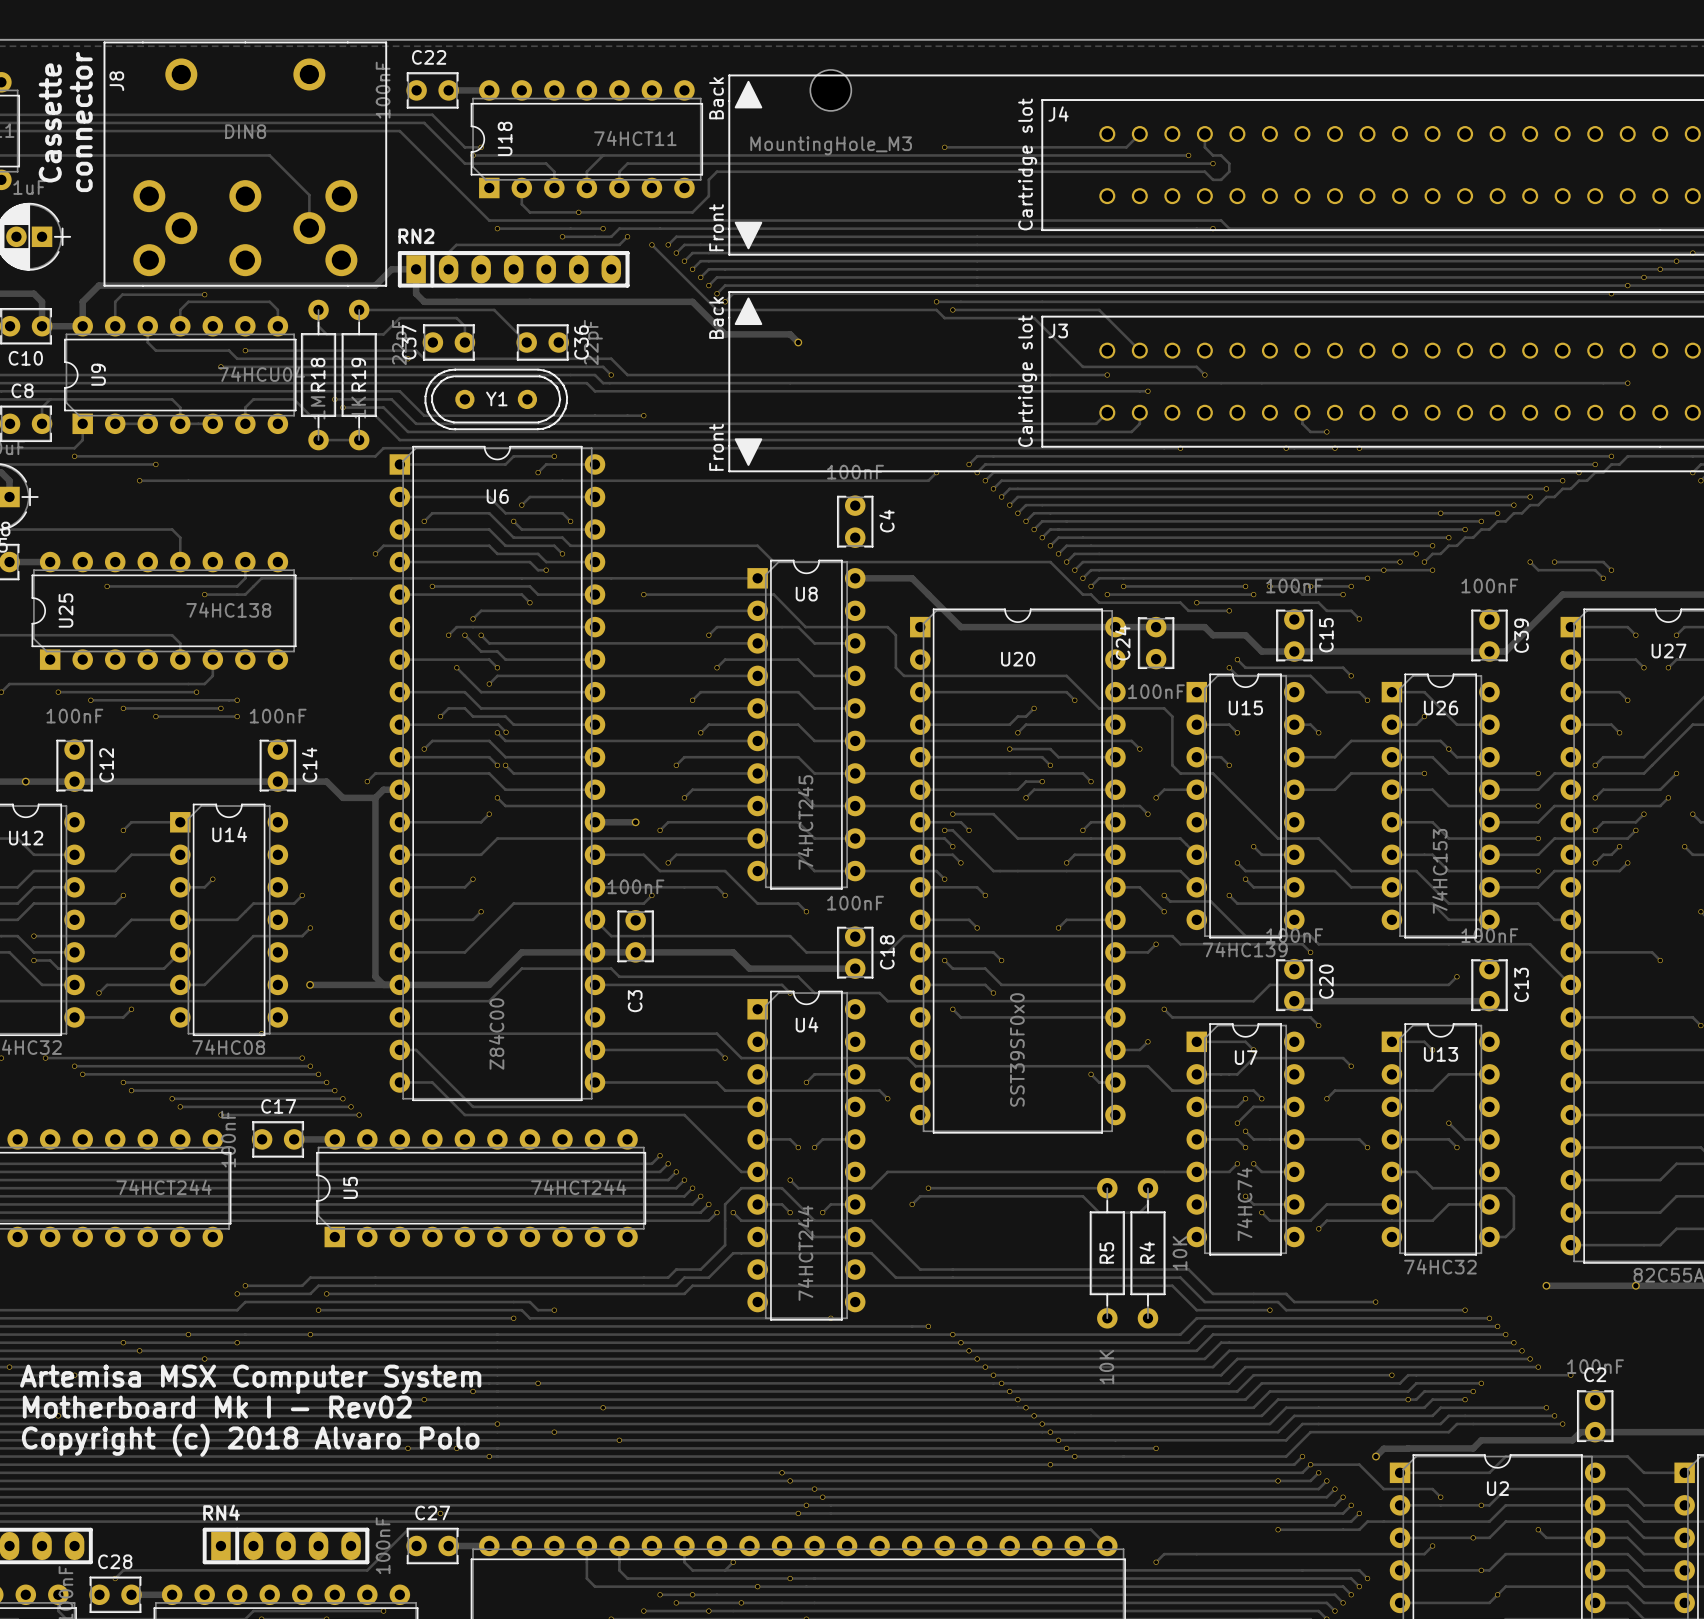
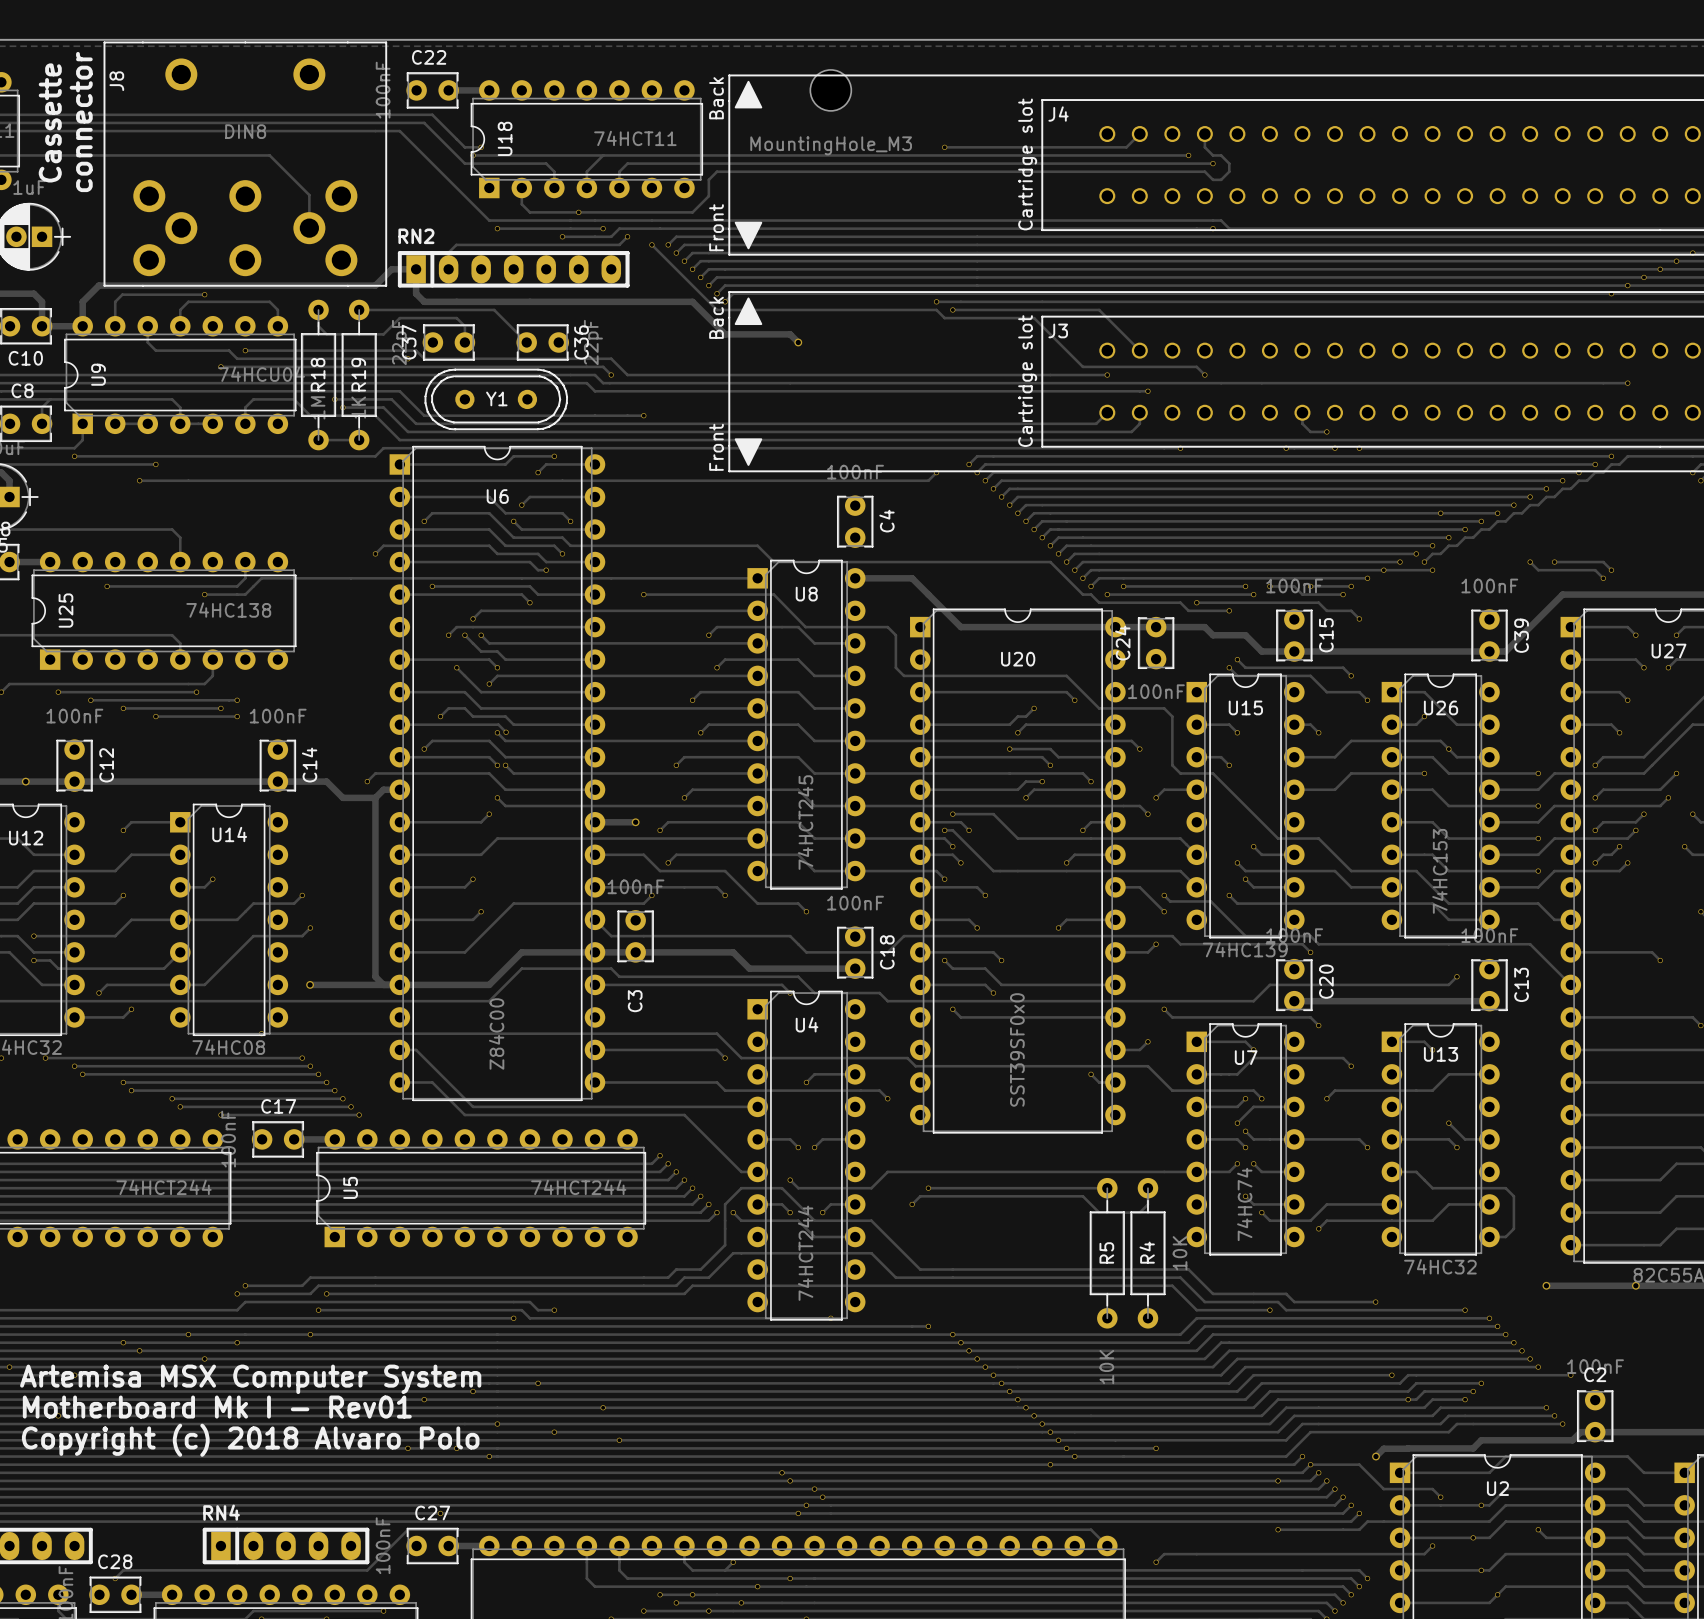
text: Motherboard Mk I - Rev02 (217, 1407) -> Motherboard Mk I - Rev01 (217, 1407)

